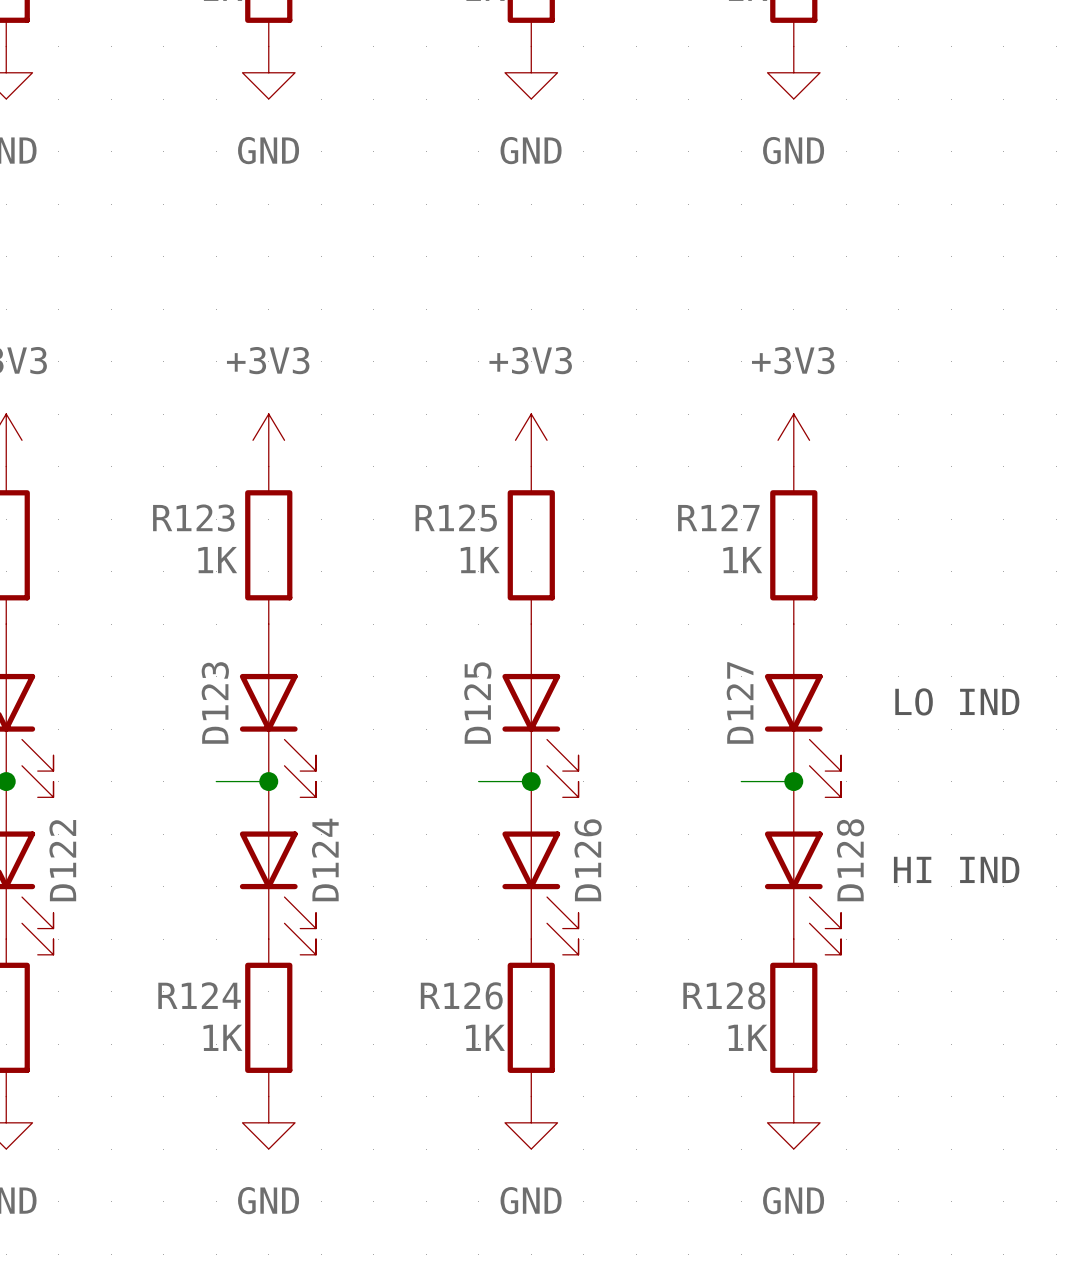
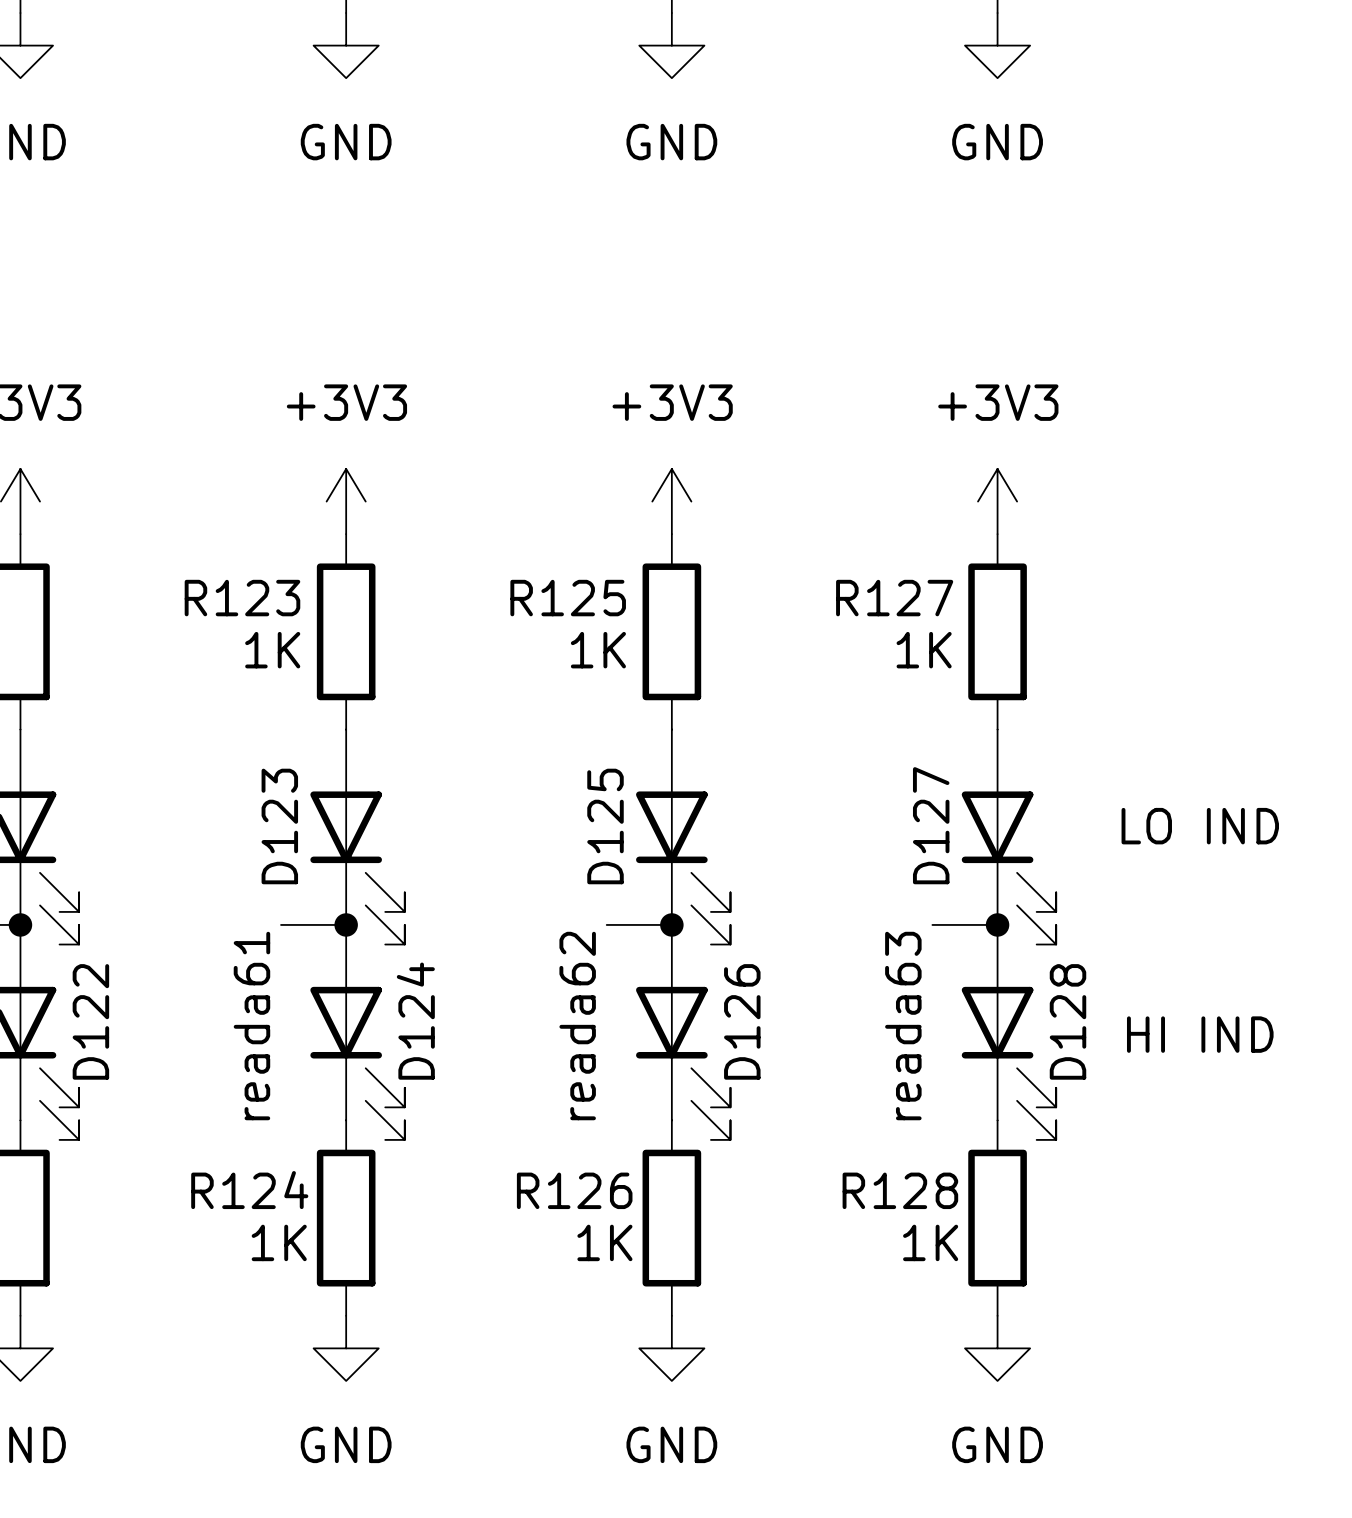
label: none -> reada61 (251, 1026)
label: none -> reada62 (577, 1026)
label: none -> reada63 (903, 1026)

